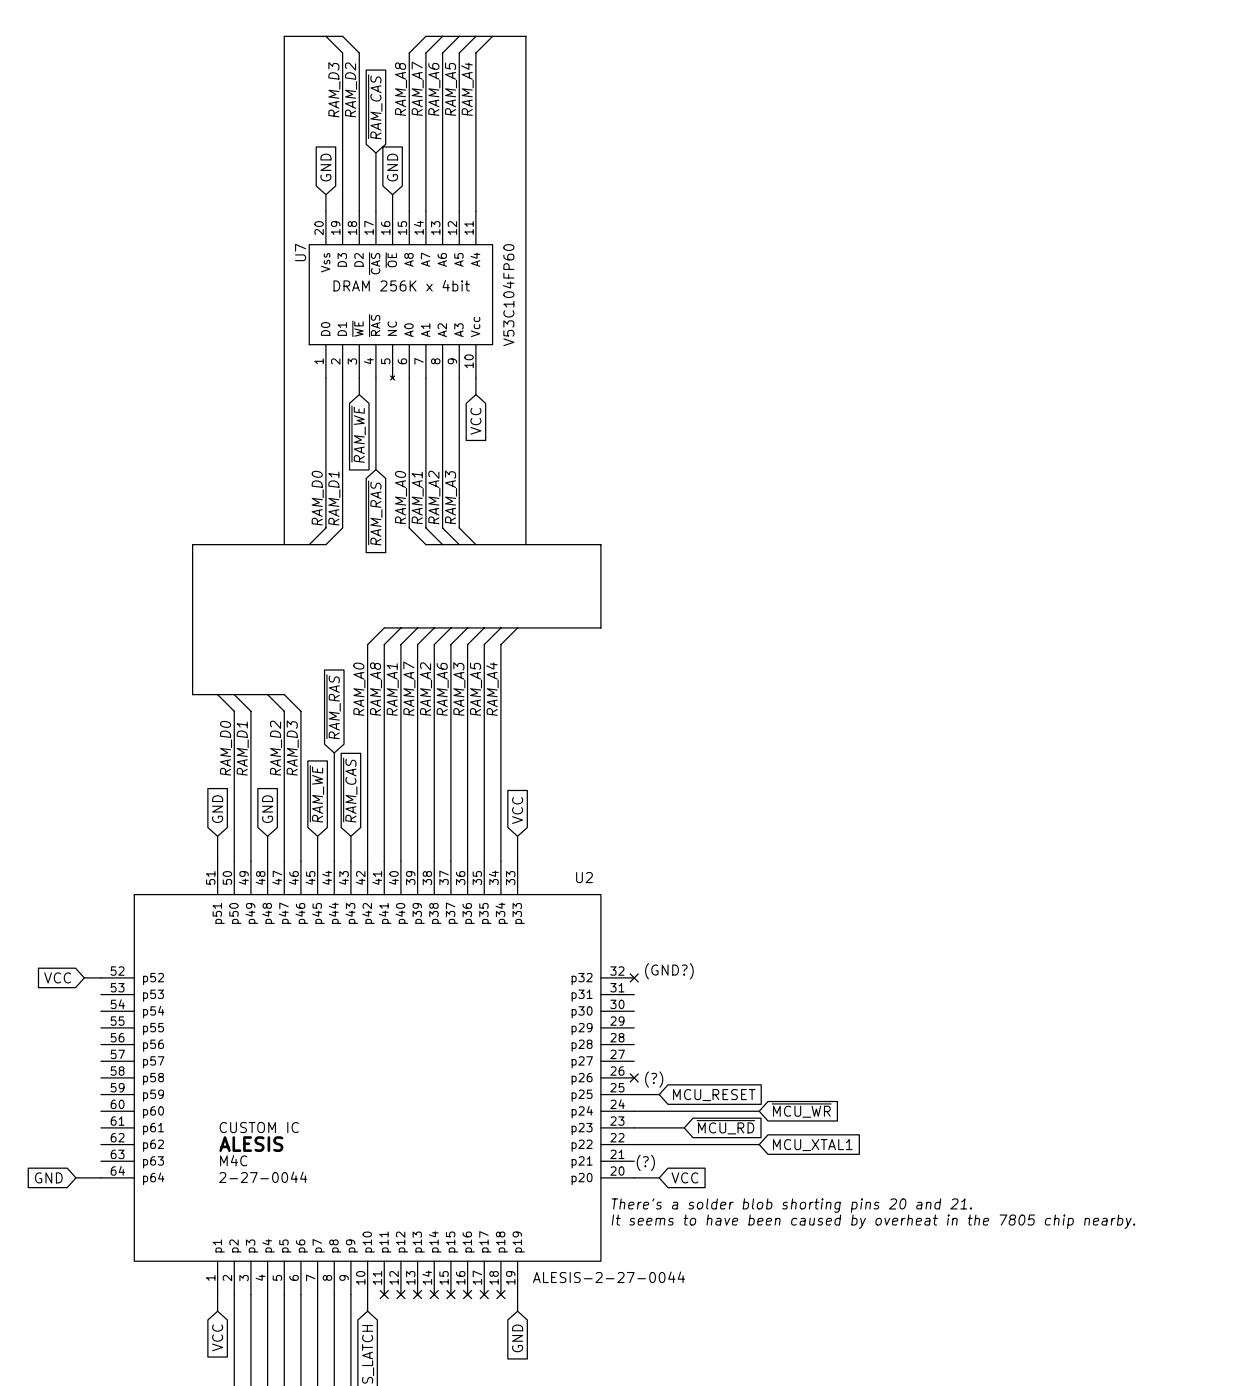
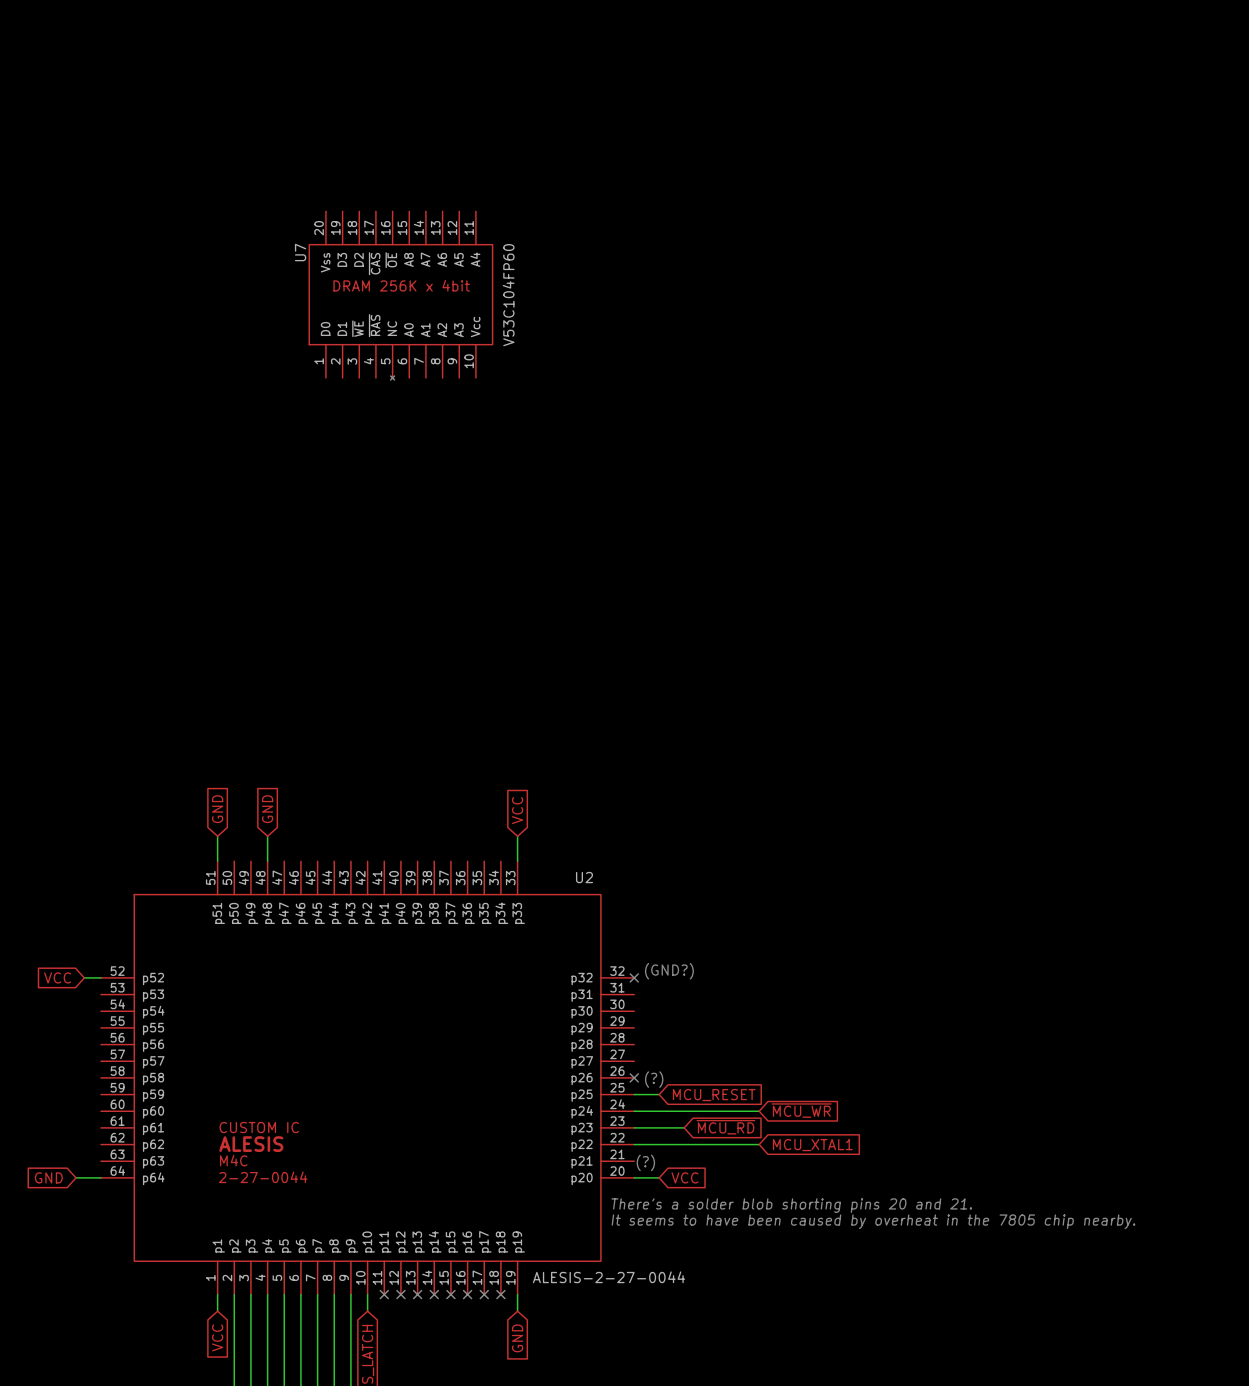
wire: (325, 36) (342, 53) (342, 211) -> none
wire: (342, 36) (359, 53) (359, 211) -> none
bus: (342, 36) (284, 36) (284, 544) -> none
wire: (425, 36) (409, 53) (409, 211) -> none
bus: (425, 36) (525, 36) (525, 544) -> none
wire: (442, 36) (425, 53) (425, 211) -> none
wire: (459, 36) (442, 53) (442, 211) -> none
wire: (475, 36) (459, 53) (459, 211) -> none
wire: (492, 36) (475, 53) (475, 211) -> none
label: RAM_A7 (417, 88) -> none
label: RAM_D3 (334, 89) -> none
label: RAM_D2 (351, 89) -> none
label: RAM_A8 (401, 89) -> none
label: RAM_A6 (434, 89) -> none
label: RAM_A5 (451, 89) -> none
label: RAM_A4 (467, 89) -> none
global label: ~{RAM_CAS} (375, 106) -> none
wire: (375, 153) (375, 211) -> none
global label: GND (325, 167) -> none
global label: GND (392, 167) -> none
wire: (325, 194) (325, 211) -> none
wire: (392, 194) (392, 211) -> none
wire: (325, 377) (325, 527) (309, 544) -> none
wire: (342, 377) (342, 527) (325, 544) -> none
wire: (359, 377) (359, 394) -> none
wire: (375, 377) (375, 469) -> none
wire: (409, 377) (409, 527) (425, 544) -> none
wire: (425, 377) (425, 527) (442, 544) -> none
wire: (442, 377) (442, 527) (459, 544) -> none
wire: (459, 377) (459, 527) (475, 544) -> none
wire: (475, 377) (475, 394) -> none
global label: VCC (475, 421) -> none
global label: ~{RAM_WE} (358, 434) -> none
label: RAM_A0 (401, 497) -> none
label: RAM_A1 (417, 497) -> none
label: RAM_A2 (434, 497) -> none
label: RAM_A3 (451, 497) -> none
label: RAM_D0 (317, 498) -> none
label: RAM_D1 (334, 498) -> none
global label: ~{RAM_RAS} (375, 512) -> none
bus: (325, 544) (192, 544) (192, 694) (284, 694) -> none
bus: (425, 544) (600, 544) (600, 627) (384, 627) -> none
wire: (384, 627) (367, 644) (367, 861) -> none
wire: (400, 627) (384, 644) (384, 861) -> none
wire: (417, 627) (400, 644) (400, 861) -> none
wire: (434, 627) (417, 644) (417, 861) -> none
wire: (450, 627) (434, 644) (434, 861) -> none
wire: (467, 627) (450, 644) (450, 861) -> none
wire: (484, 627) (467, 644) (467, 861) -> none
wire: (500, 627) (484, 644) (484, 861) -> none
wire: (517, 627) (500, 644) (500, 861) -> none
label: RAM_A7 (409, 688) -> none
label: RAM_A3 (459, 688) -> none
label: RAM_A0 (359, 689) -> none
label: RAM_A8 (376, 689) -> none
label: RAM_A1 (392, 689) -> none
label: RAM_A2 (426, 689) -> none
label: RAM_A6 (442, 689) -> none
label: RAM_A5 (476, 689) -> none
label: RAM_A4 (492, 689) -> none
wire: (217, 694) (234, 711) (234, 861) -> none
wire: (234, 694) (250, 711) (250, 861) -> none
wire: (267, 694) (284, 711) (284, 861) -> none
wire: (284, 694) (300, 711) (300, 861) -> none
global label: ~{RAM_RAS} (333, 706) -> none
label: RAM_D3 (292, 747) -> none
label: RAM_D0 (226, 748) -> none
label: RAM_D1 (242, 748) -> none
label: RAM_D2 (276, 748) -> none
wire: (334, 752) (334, 861) -> none
global label: ~{RAM_CAS} (350, 790) -> none
global label: ~{RAM_WE} (316, 793) -> none
wire: (317, 836) (317, 861) -> none
wire: (350, 836) (350, 861) -> none

